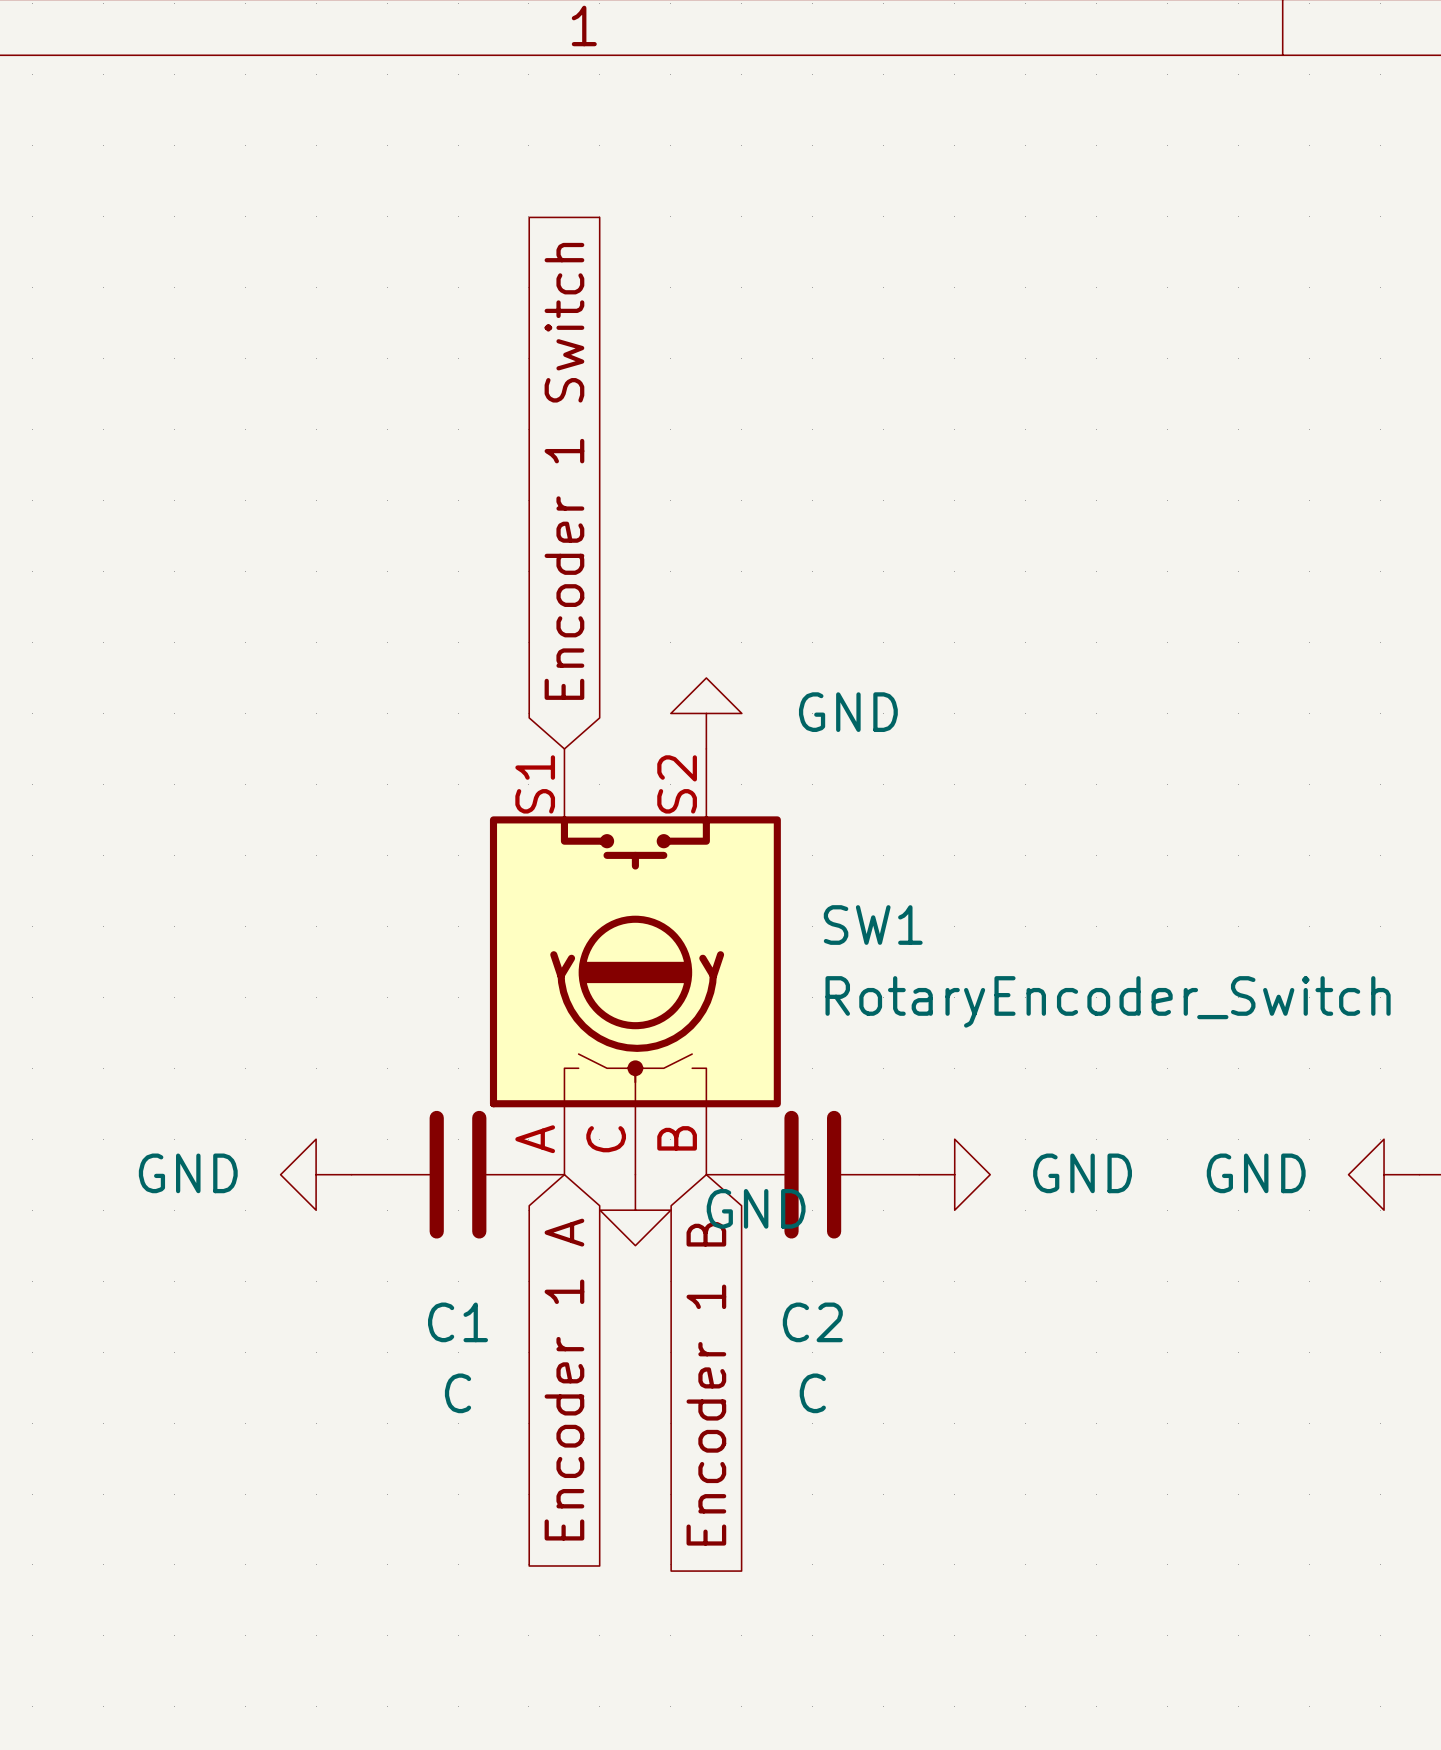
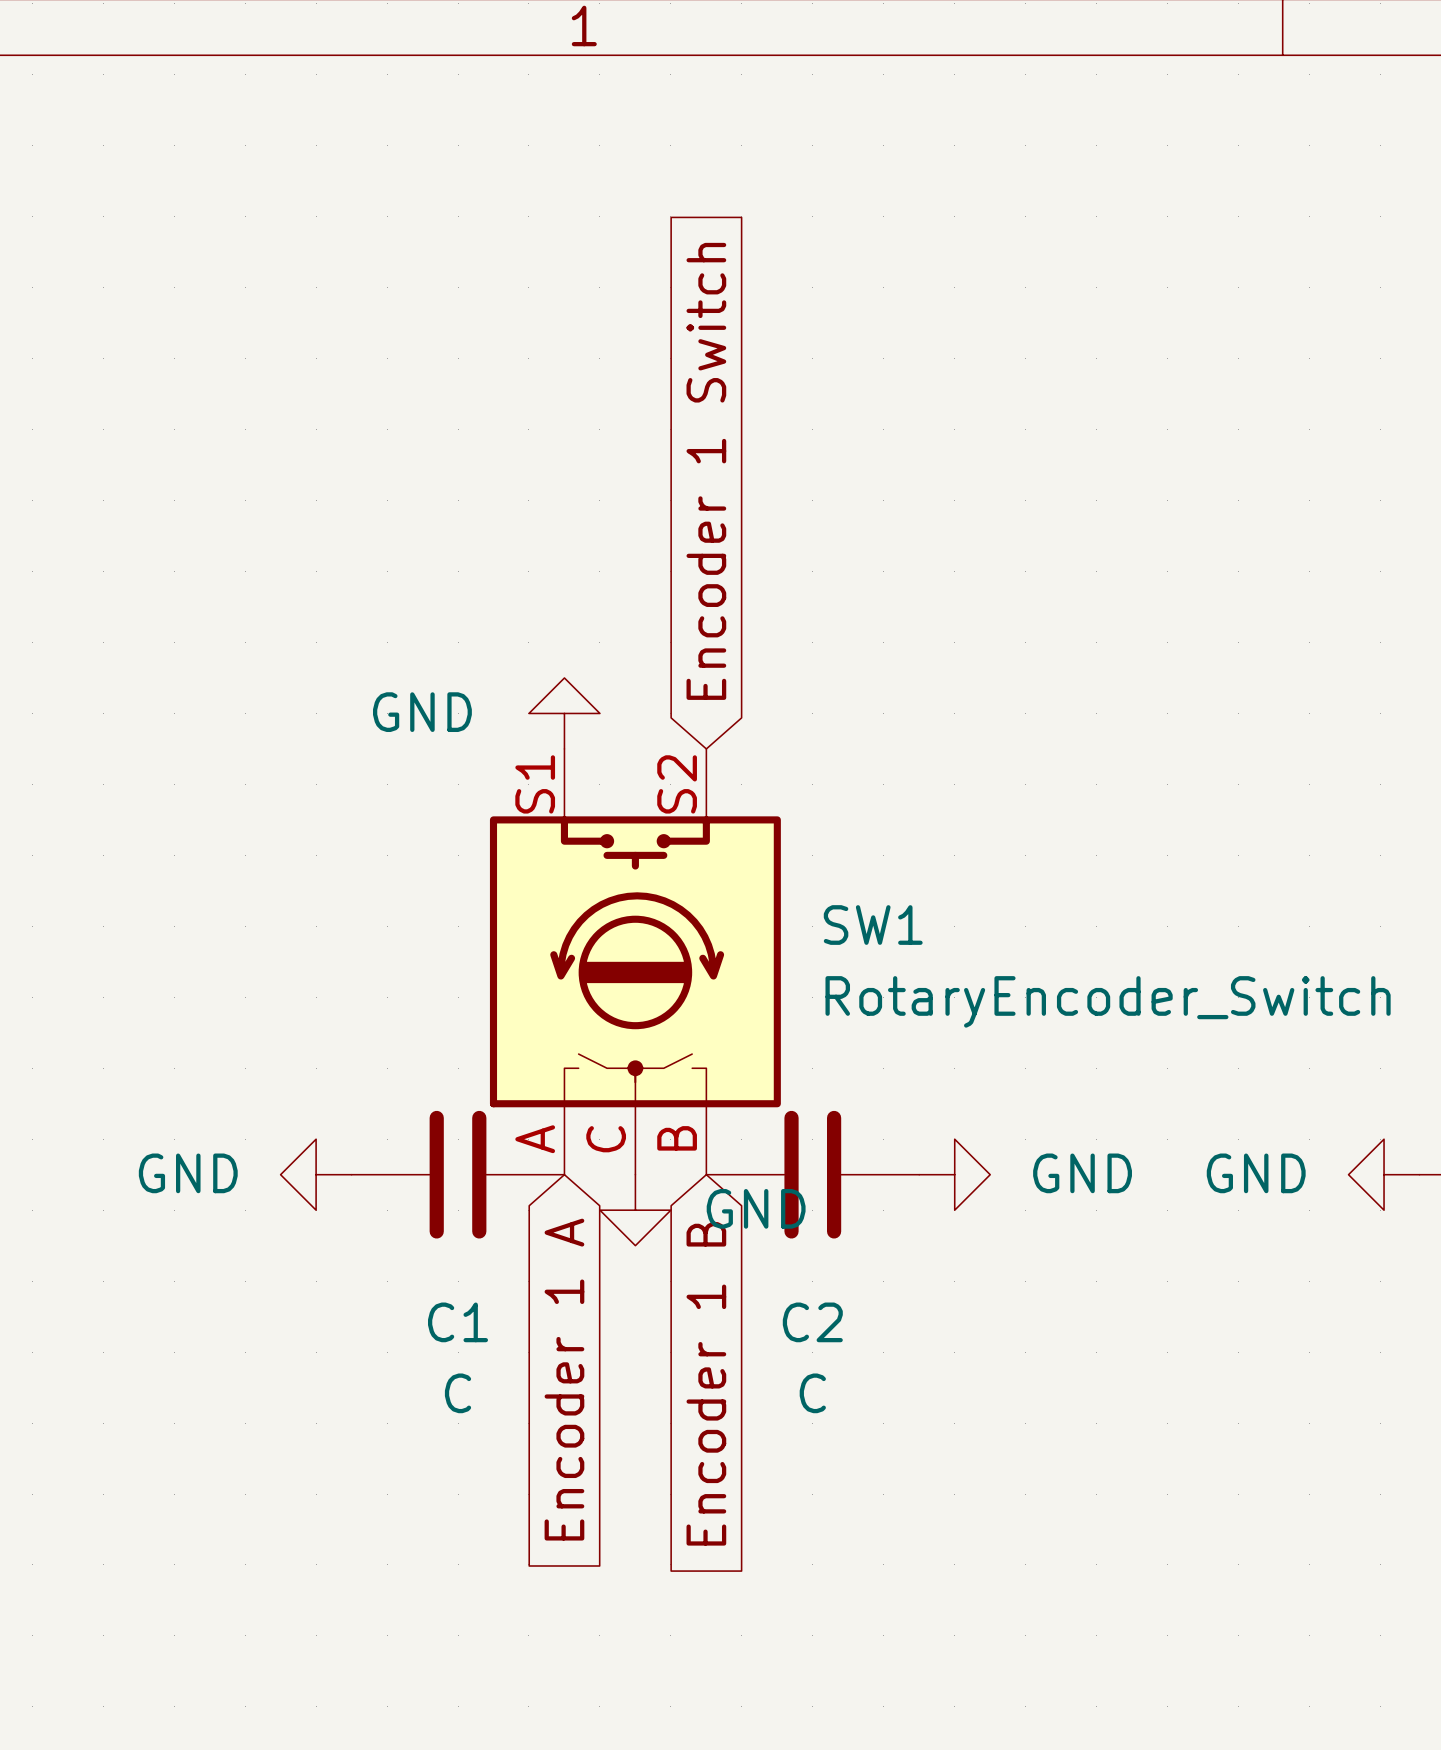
global label position: Encoder 1 Switch (564, 471) -> Encoder 1 Switch (706, 471)
power symbol text position: GND (848, 712) -> GND (422, 712)
power symbol position: GND (706, 713) -> GND (564, 713)
SW1 symbol: [489, 748, 781, 1175] -> [489, 748, 781, 1175]

